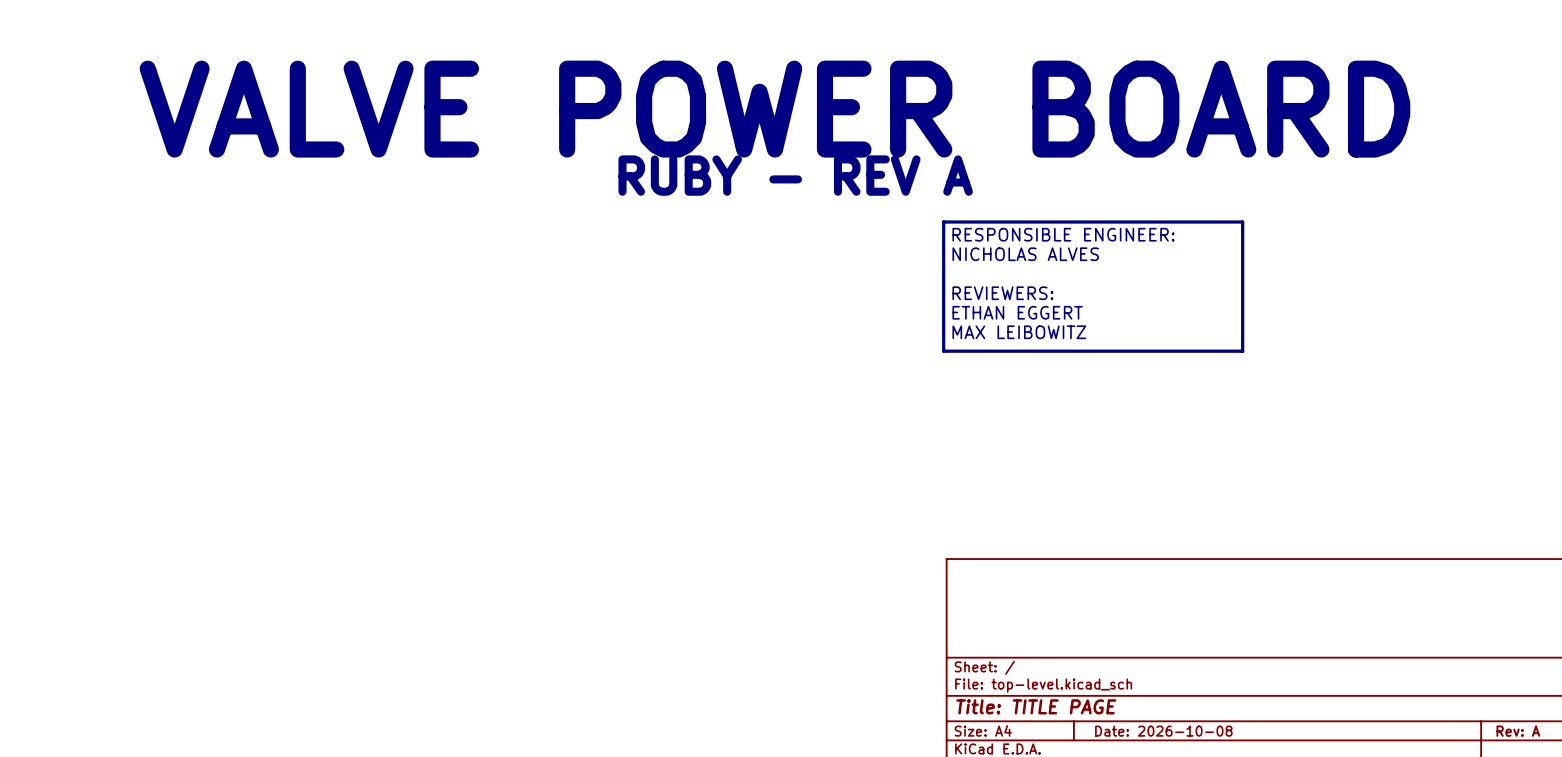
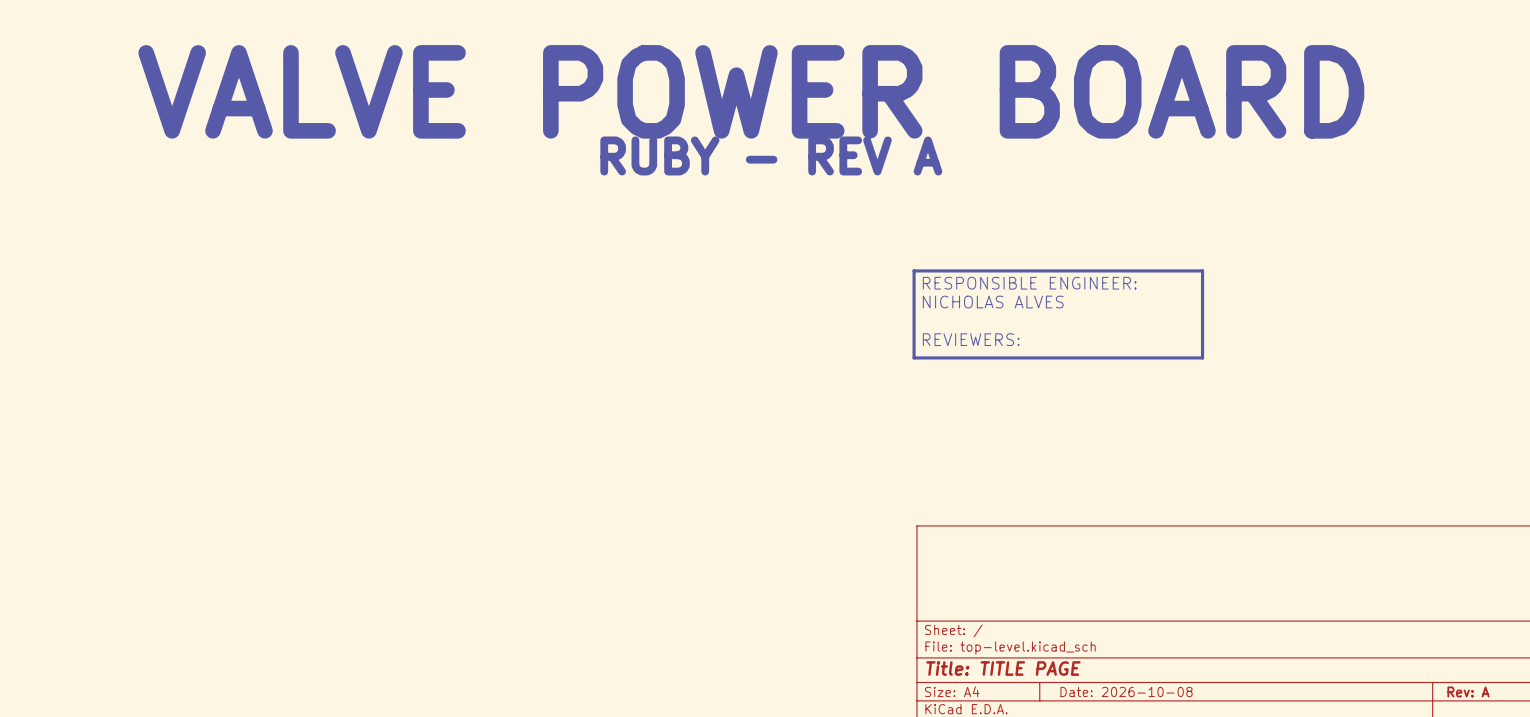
text position: RESPONSIBLE ENGINEER: (1063, 234) -> RESPONSIBLE ENGINEER: (1029, 283)
text position: NICHOLAS ALVES (1025, 254) -> NICHOLAS ALVES (993, 302)
text position: REVIEWERS: (1002, 293) -> REVIEWERS: (971, 339)
line: (943, 294) (943, 222) (1242, 222) (1242, 294) -> (914, 270) (1202, 270)
text: ETHAN EGGERT (1017, 312) -> none
text: MAX LEIBOWITZ (1019, 332) -> none
line: (943, 351) (1242, 351) -> (914, 325) (914, 357) (1202, 357) (1202, 325)

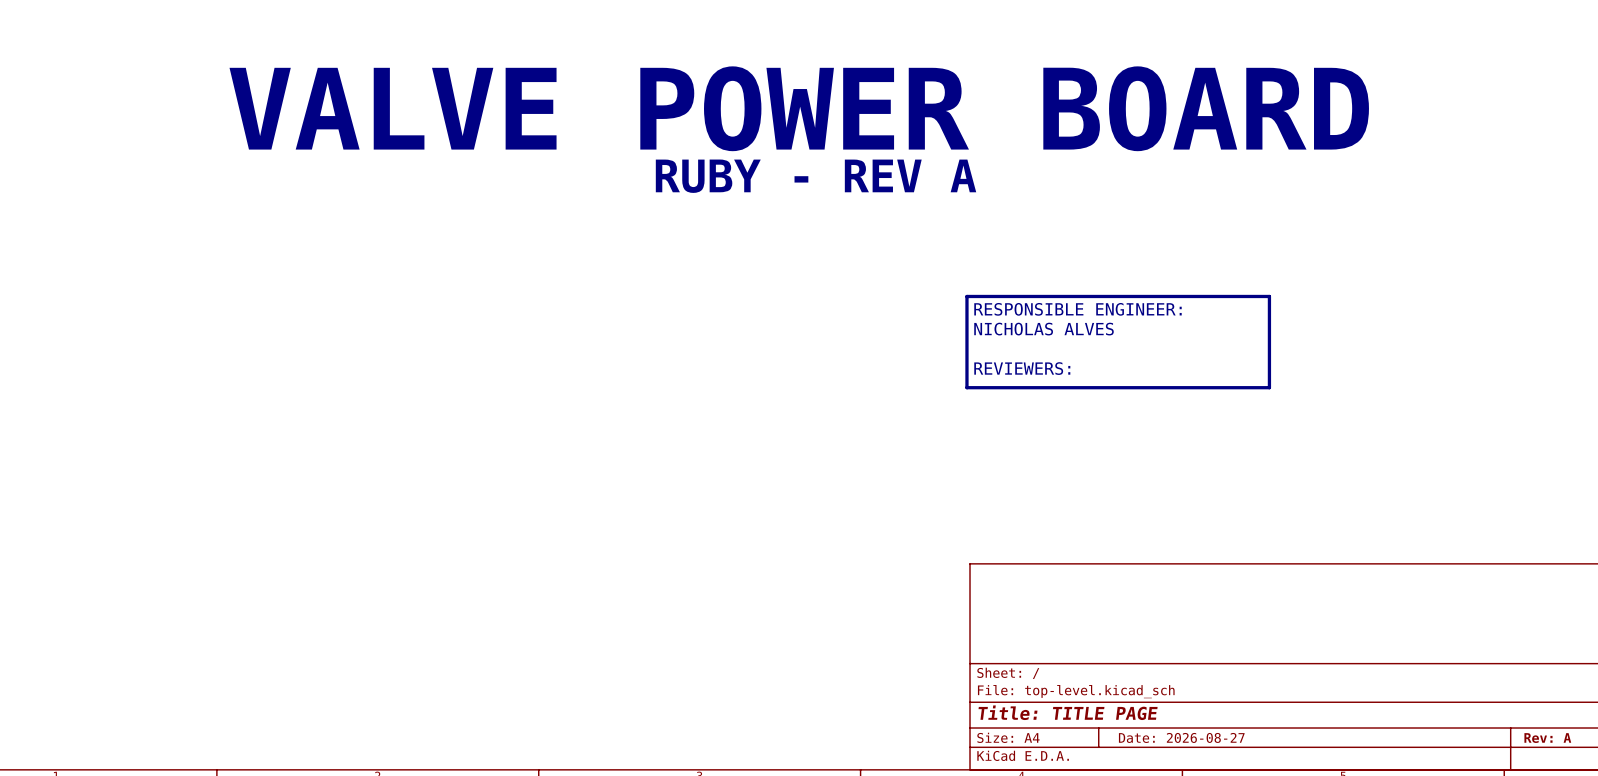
title block: Date: 2026-10-08 (1126, 691) -> Date: 2026-08-27 (1181, 737)

